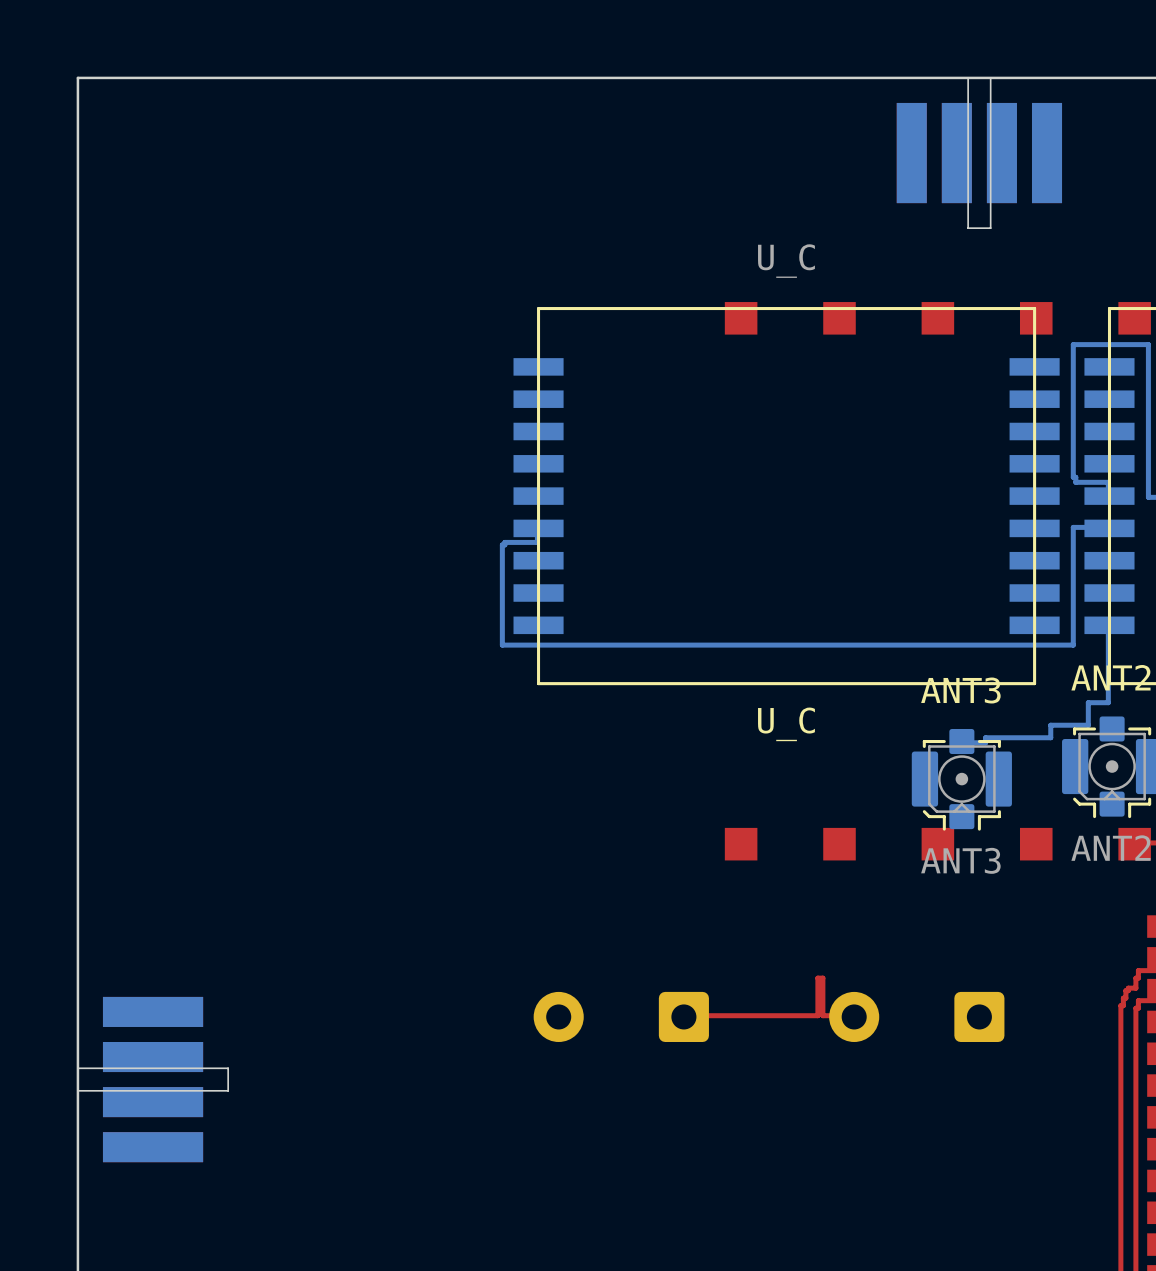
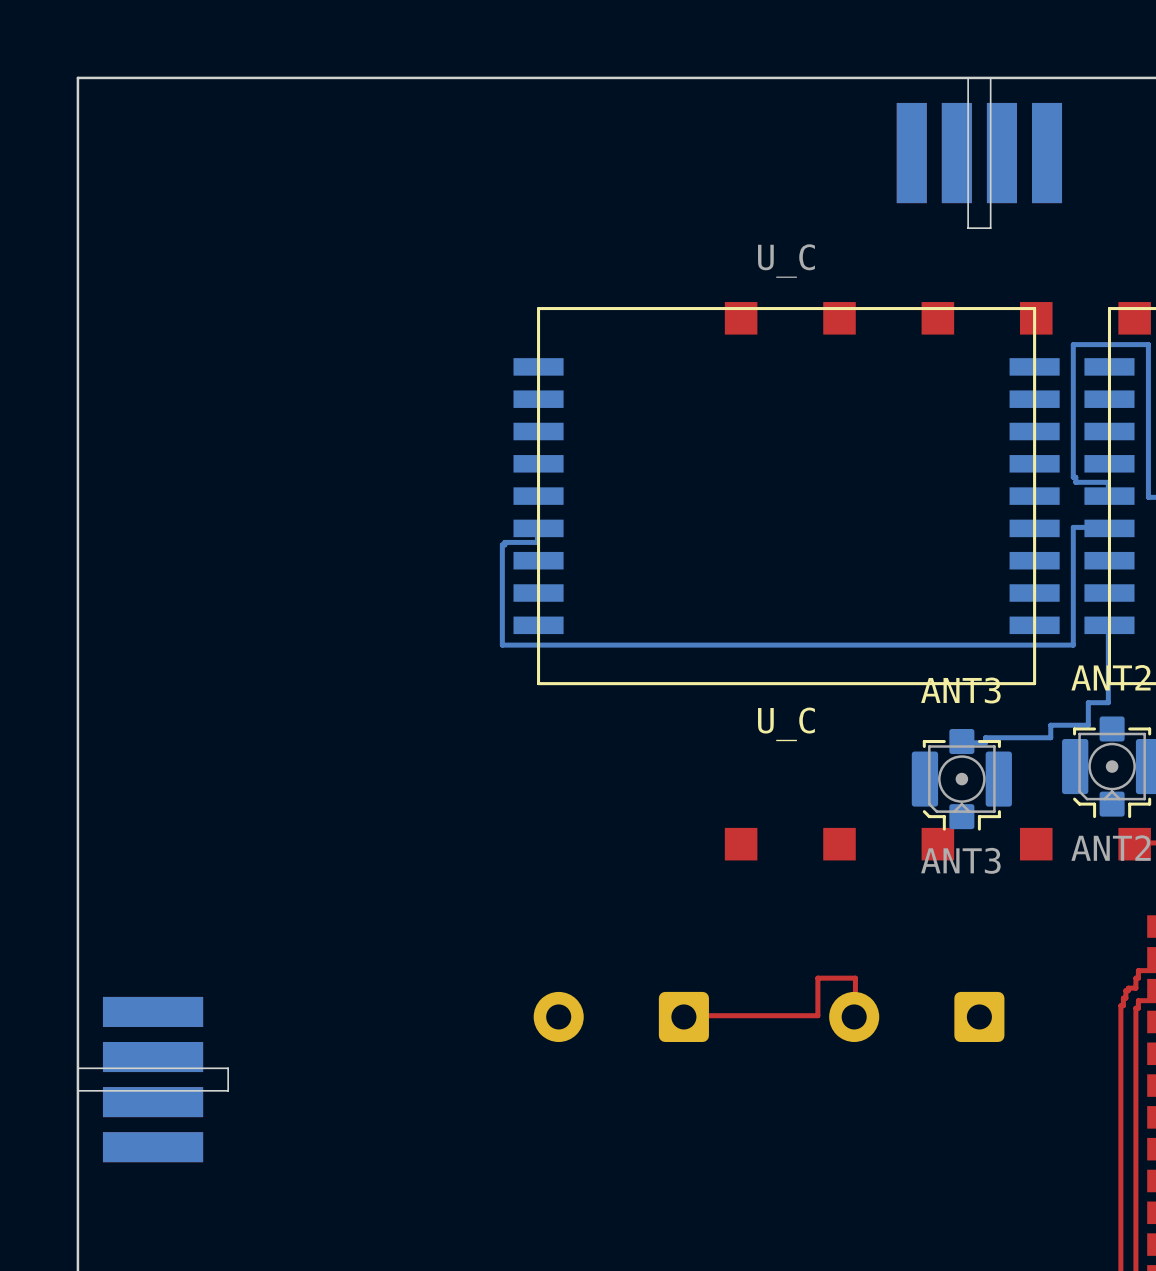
top track: (822, 978) (822, 1015) (855, 1015) -> (822, 978) (855, 978) (855, 1015)

